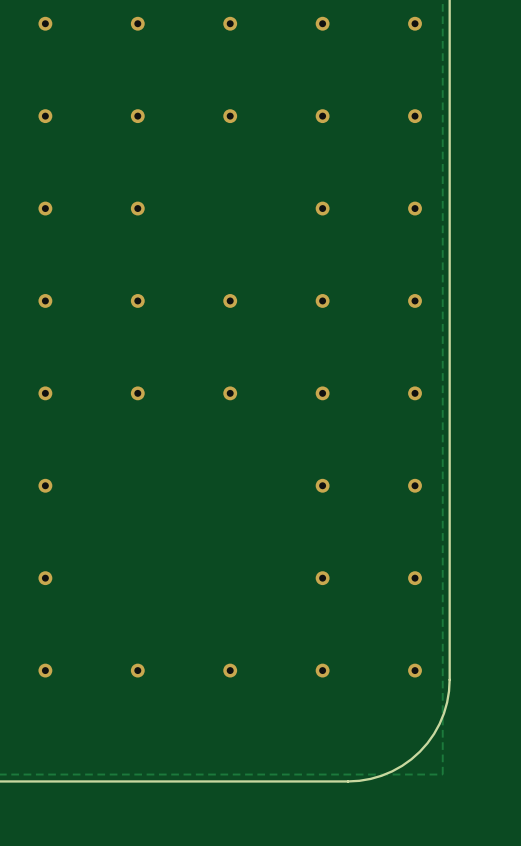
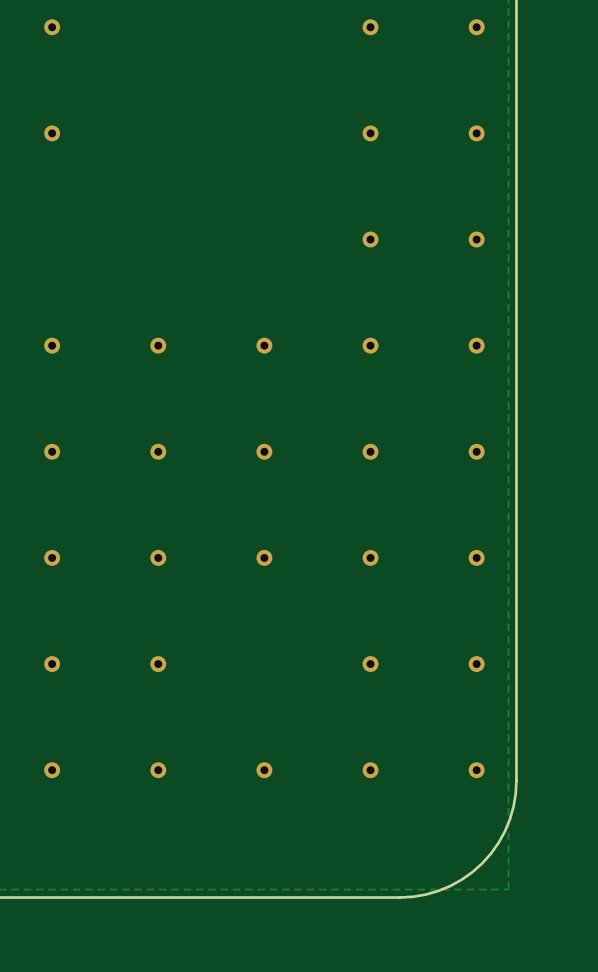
via: (137, 23) -> none
via: (230, 23) -> none
via: (137, 116) -> none
via: (230, 116) -> none
via: (45, 208) -> none
via: (137, 208) -> none
via: none -> (158, 557)
via: none -> (264, 557)
via: none -> (158, 664)

